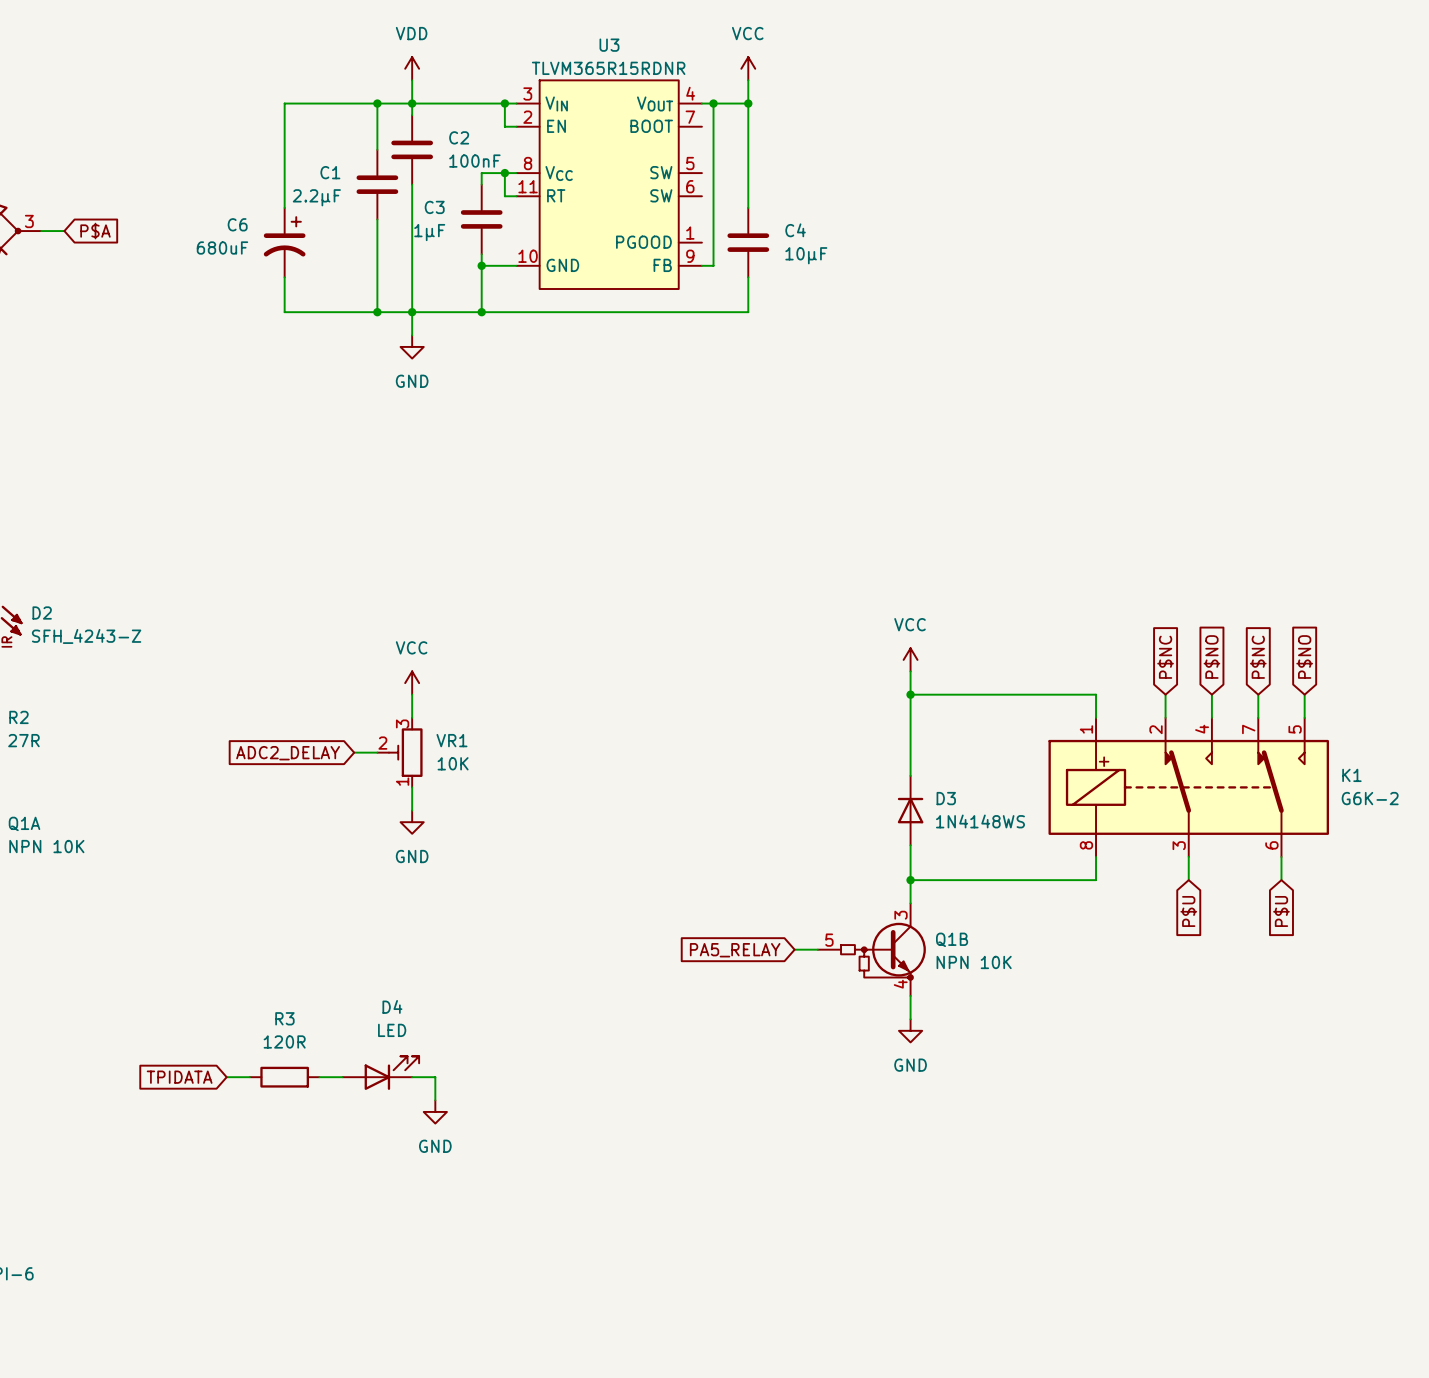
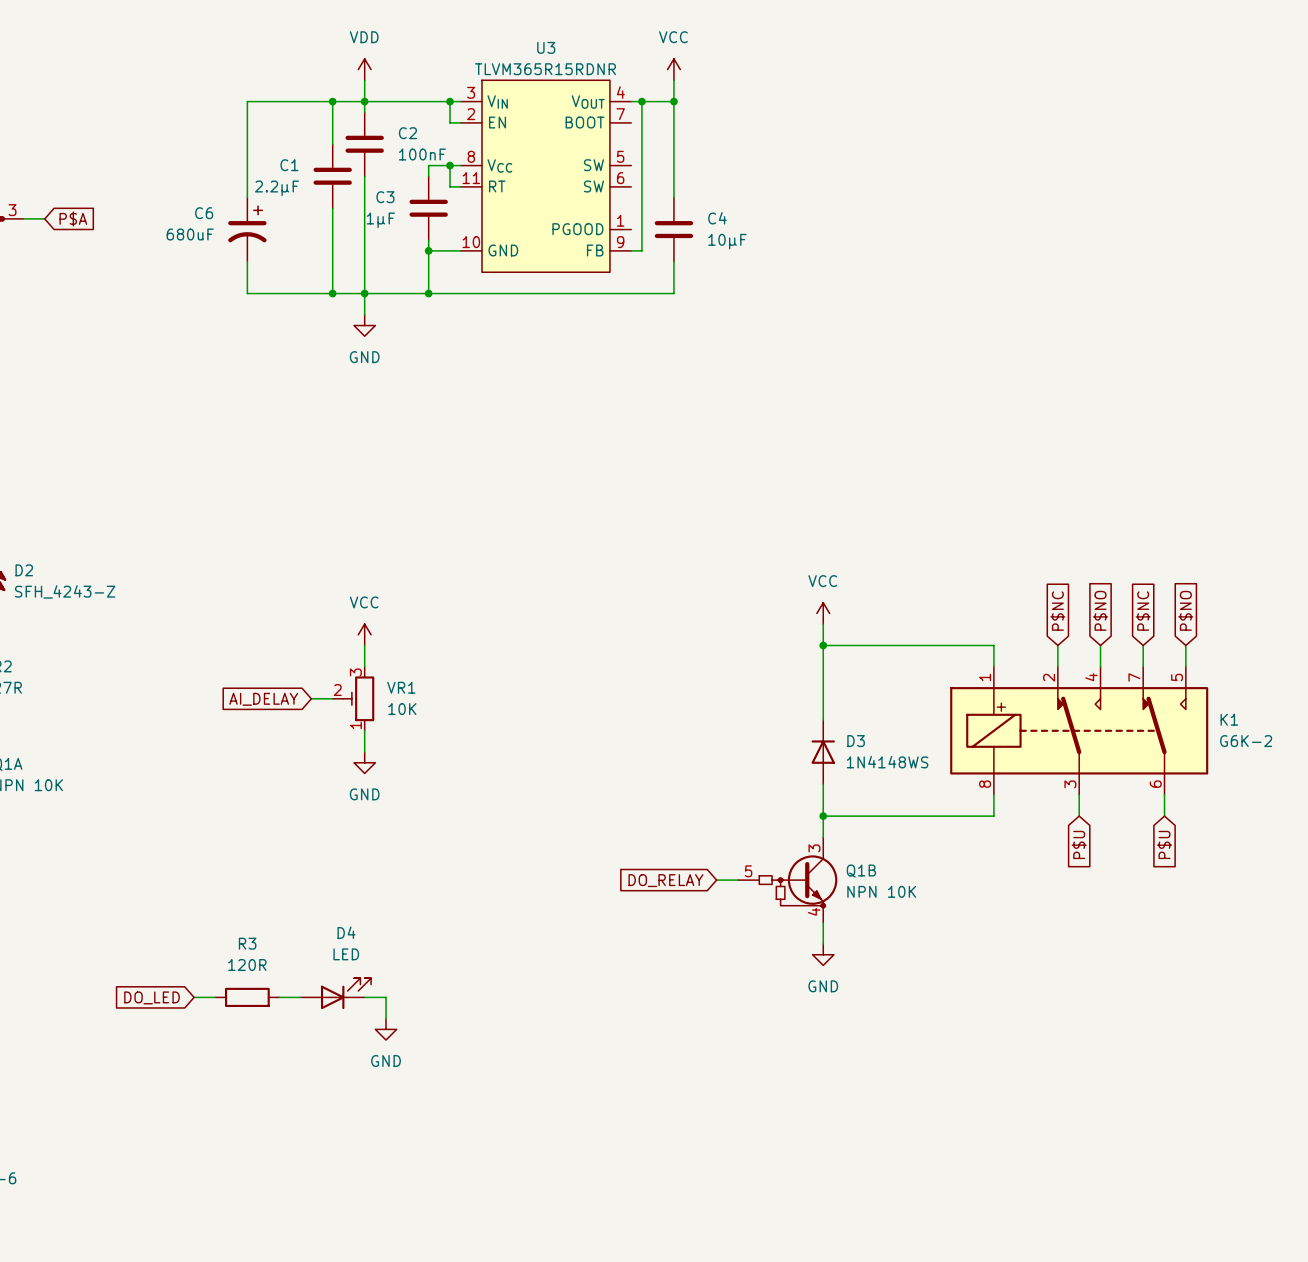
global label: ADC2_DELAY (288, 753) -> AI_DELAY (263, 699)
global label: PA5_RELAY (735, 950) -> DO_RELAY (665, 880)
global label: TPIDATA (179, 1077) -> DO_LED (152, 997)

